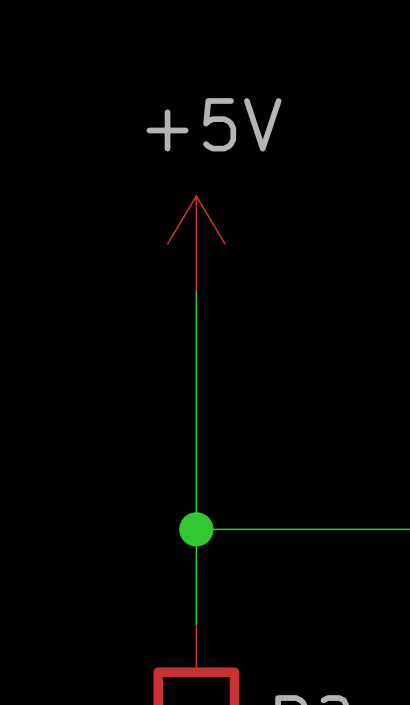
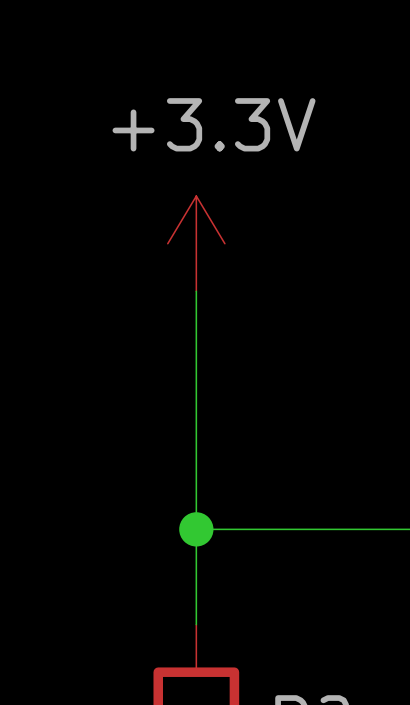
power symbol: +5V (196, 243) -> +3.3V (196, 243)

